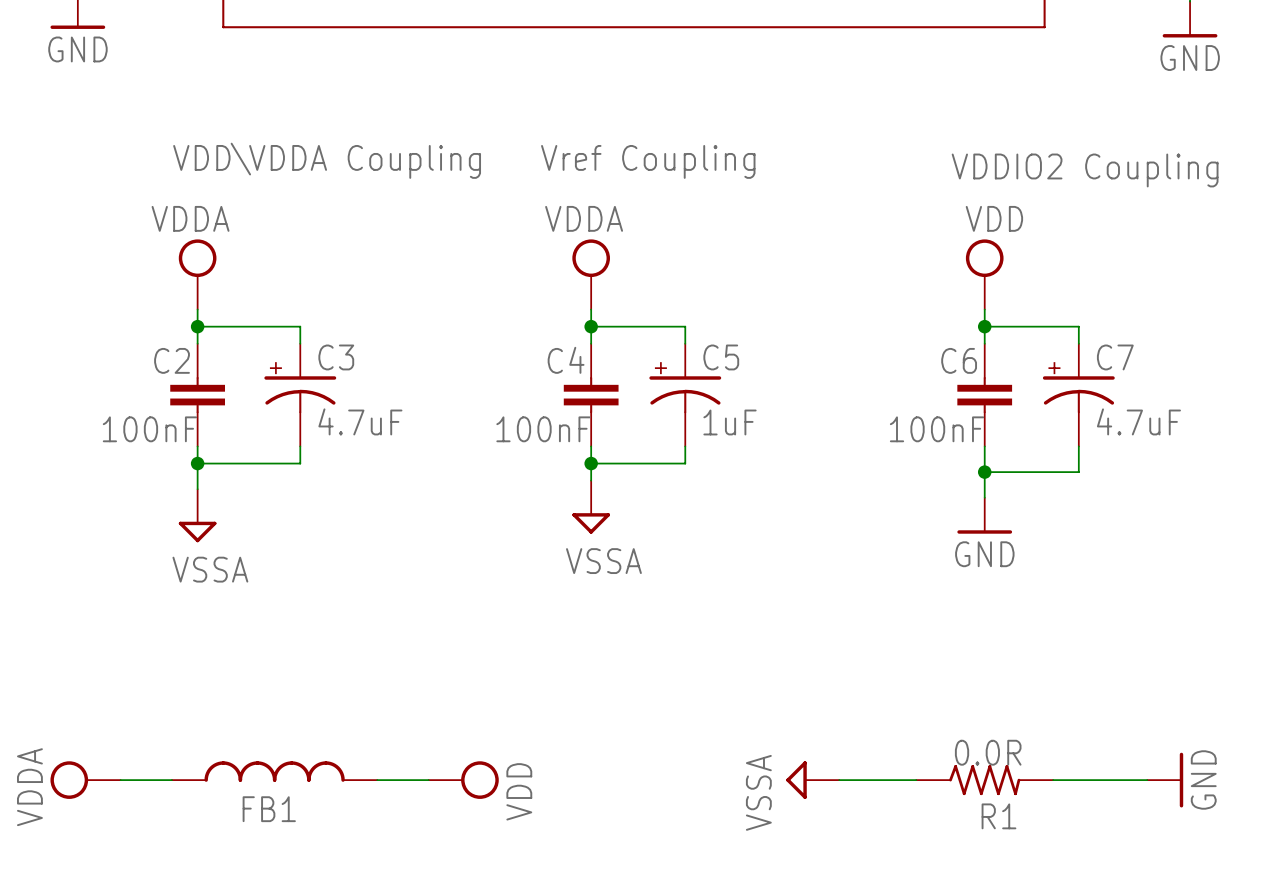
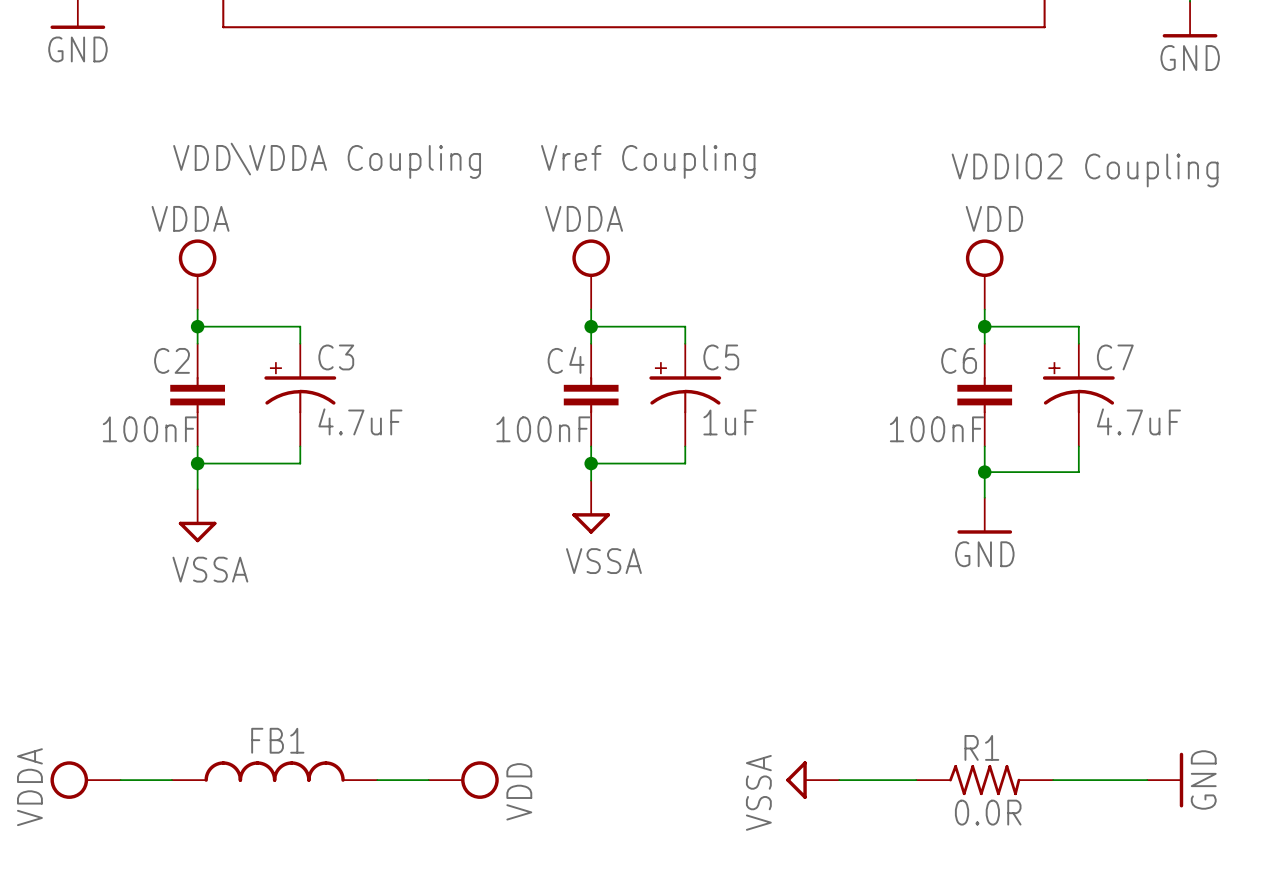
R1 value position: 0.0R (988, 752) -> 0.0R (988, 812)
FB1 name position: FB1 (269, 809) -> FB1 (277, 740)
R1 name position: R1 (998, 816) -> R1 (981, 747)

